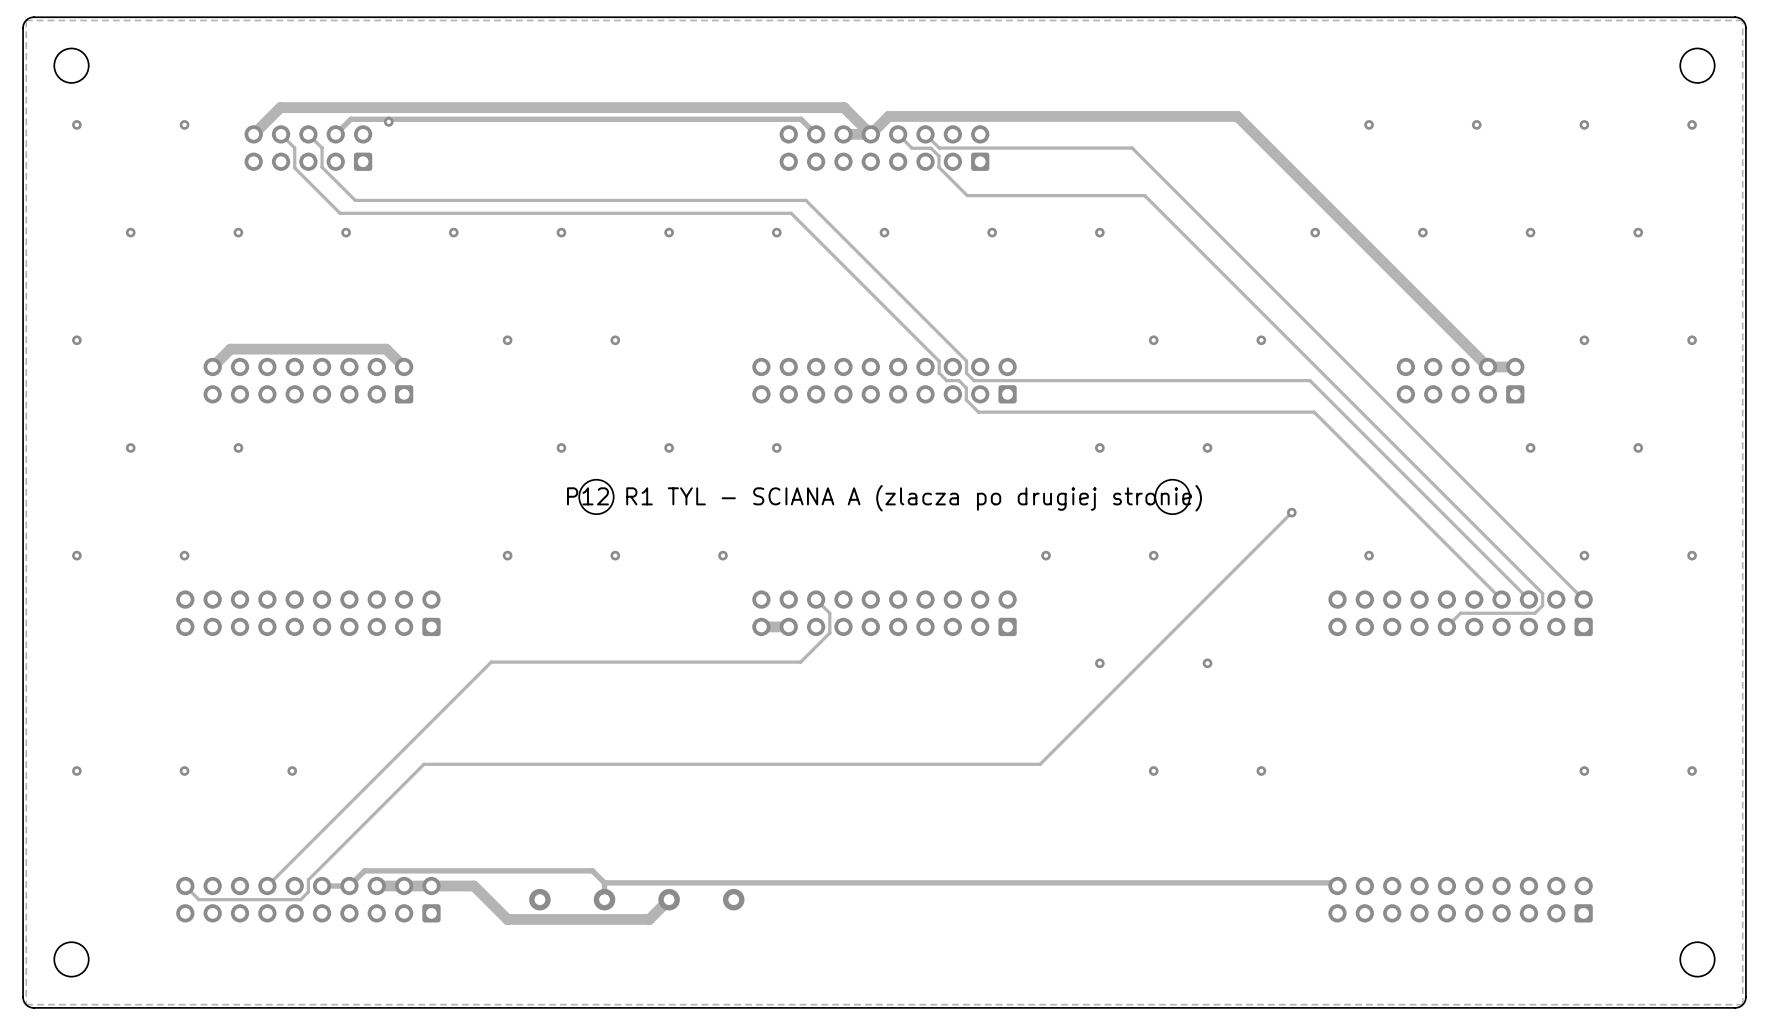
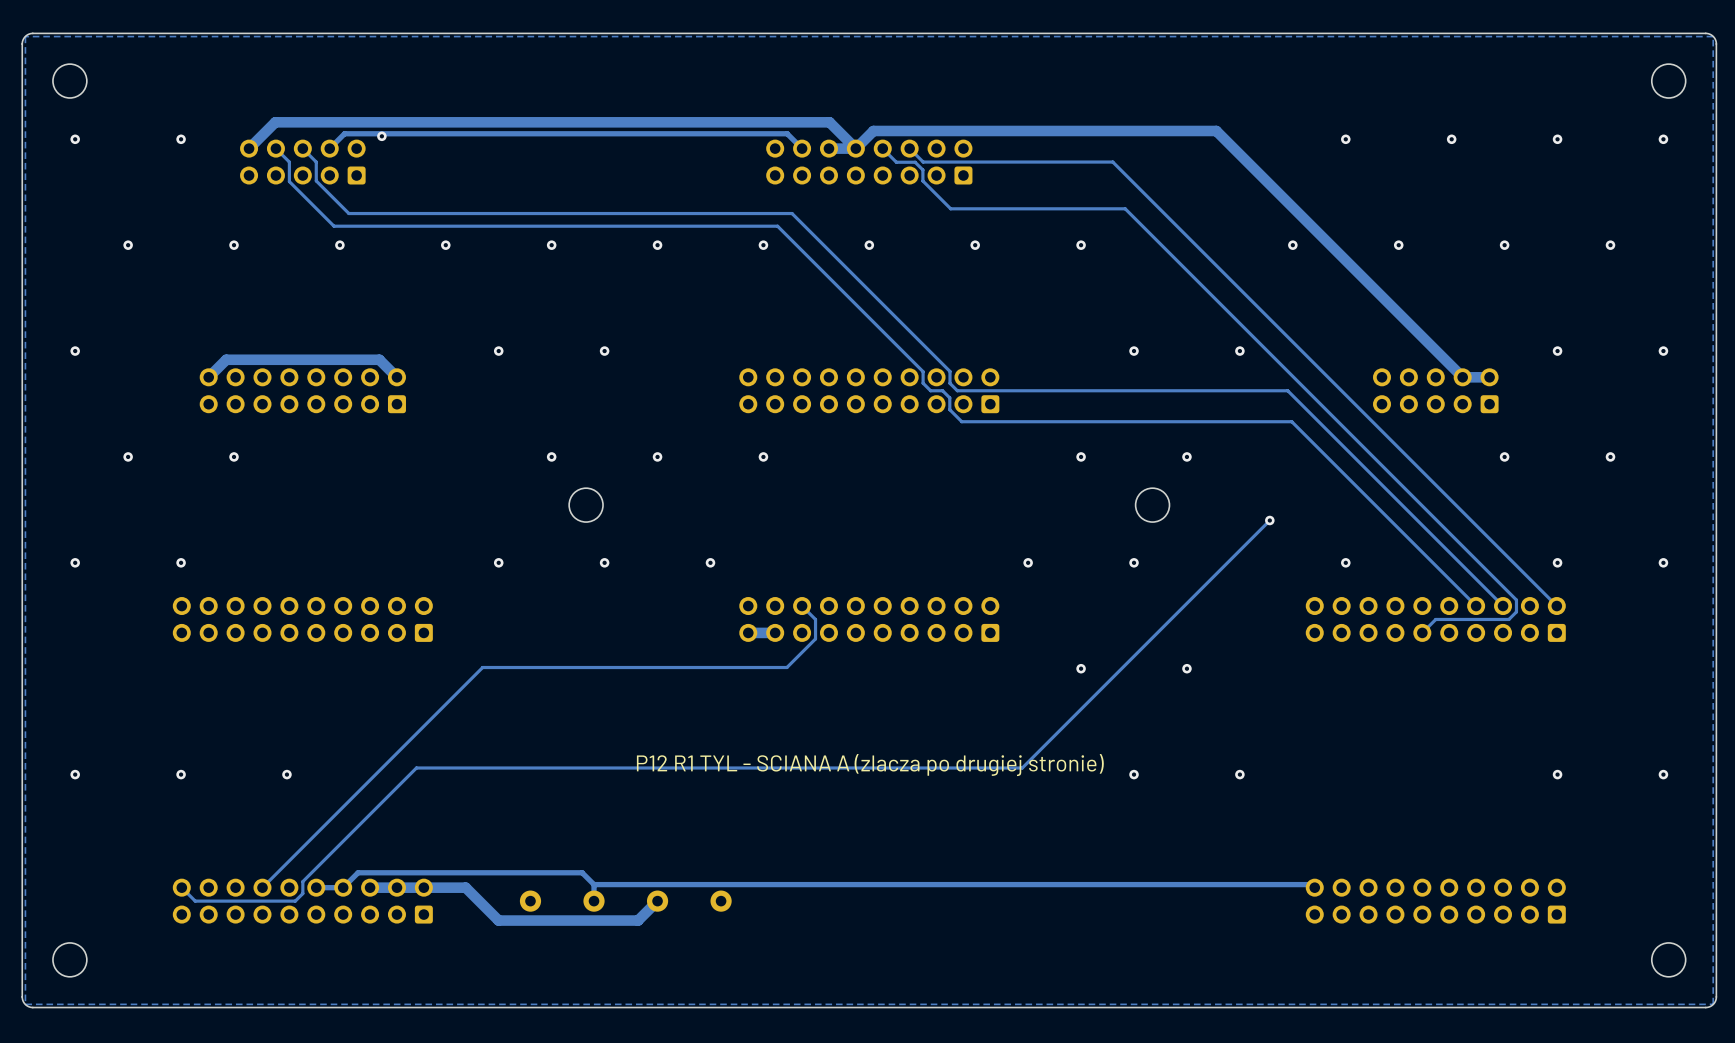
text position: P12 R1 TYL - SCIANA A (zlacza po drugiej stronie) (884, 498) -> P12 R1 TYL - SCIANA A (zlacza po drugiej stronie) (870, 765)

